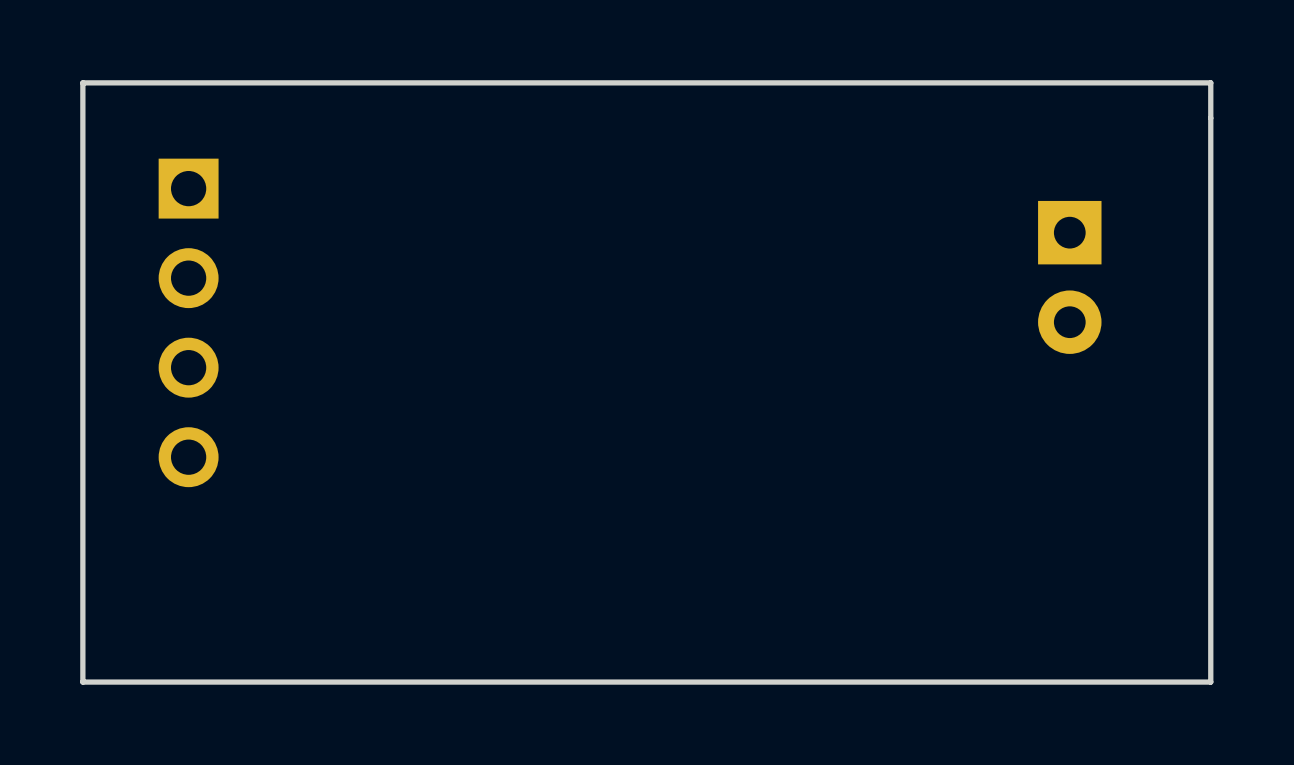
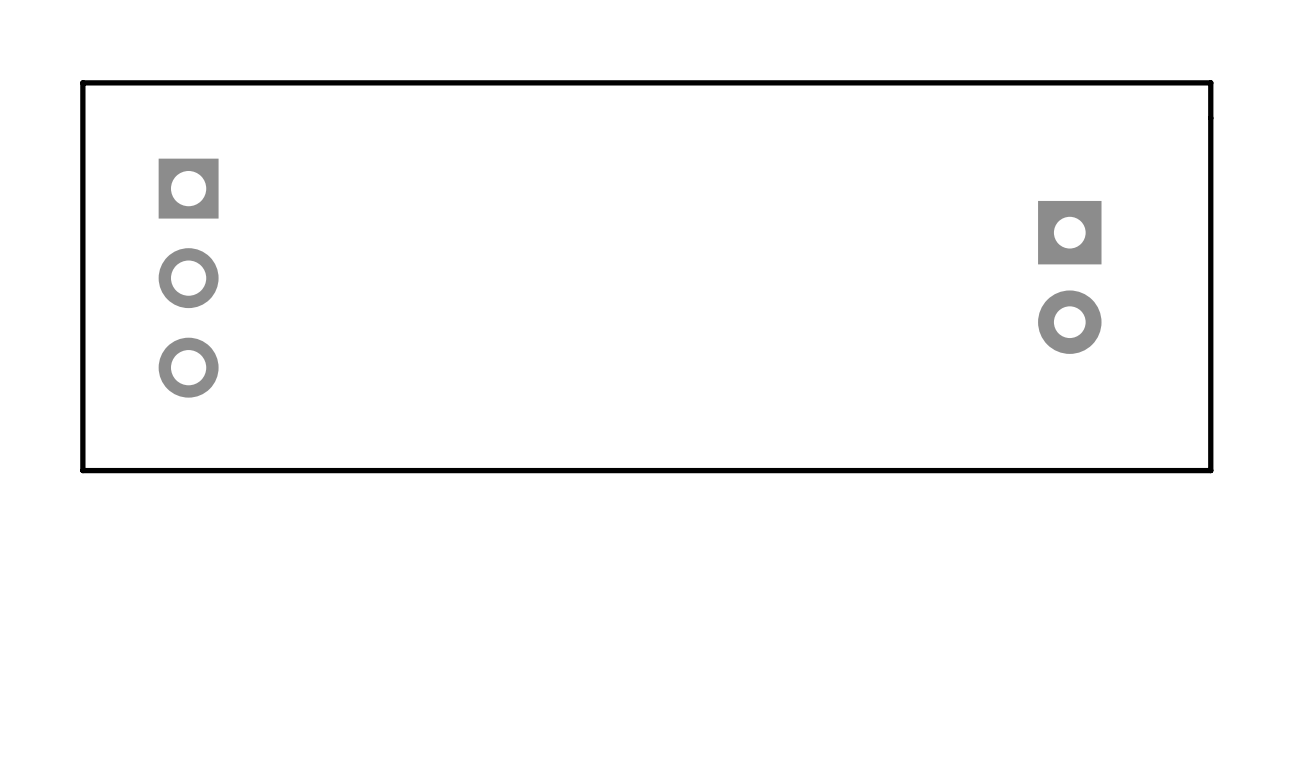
part: (188, 322) -> none
board edge: (1210, 470) (1210, 682) (82, 682) (82, 470) -> (1210, 470) (82, 470)

